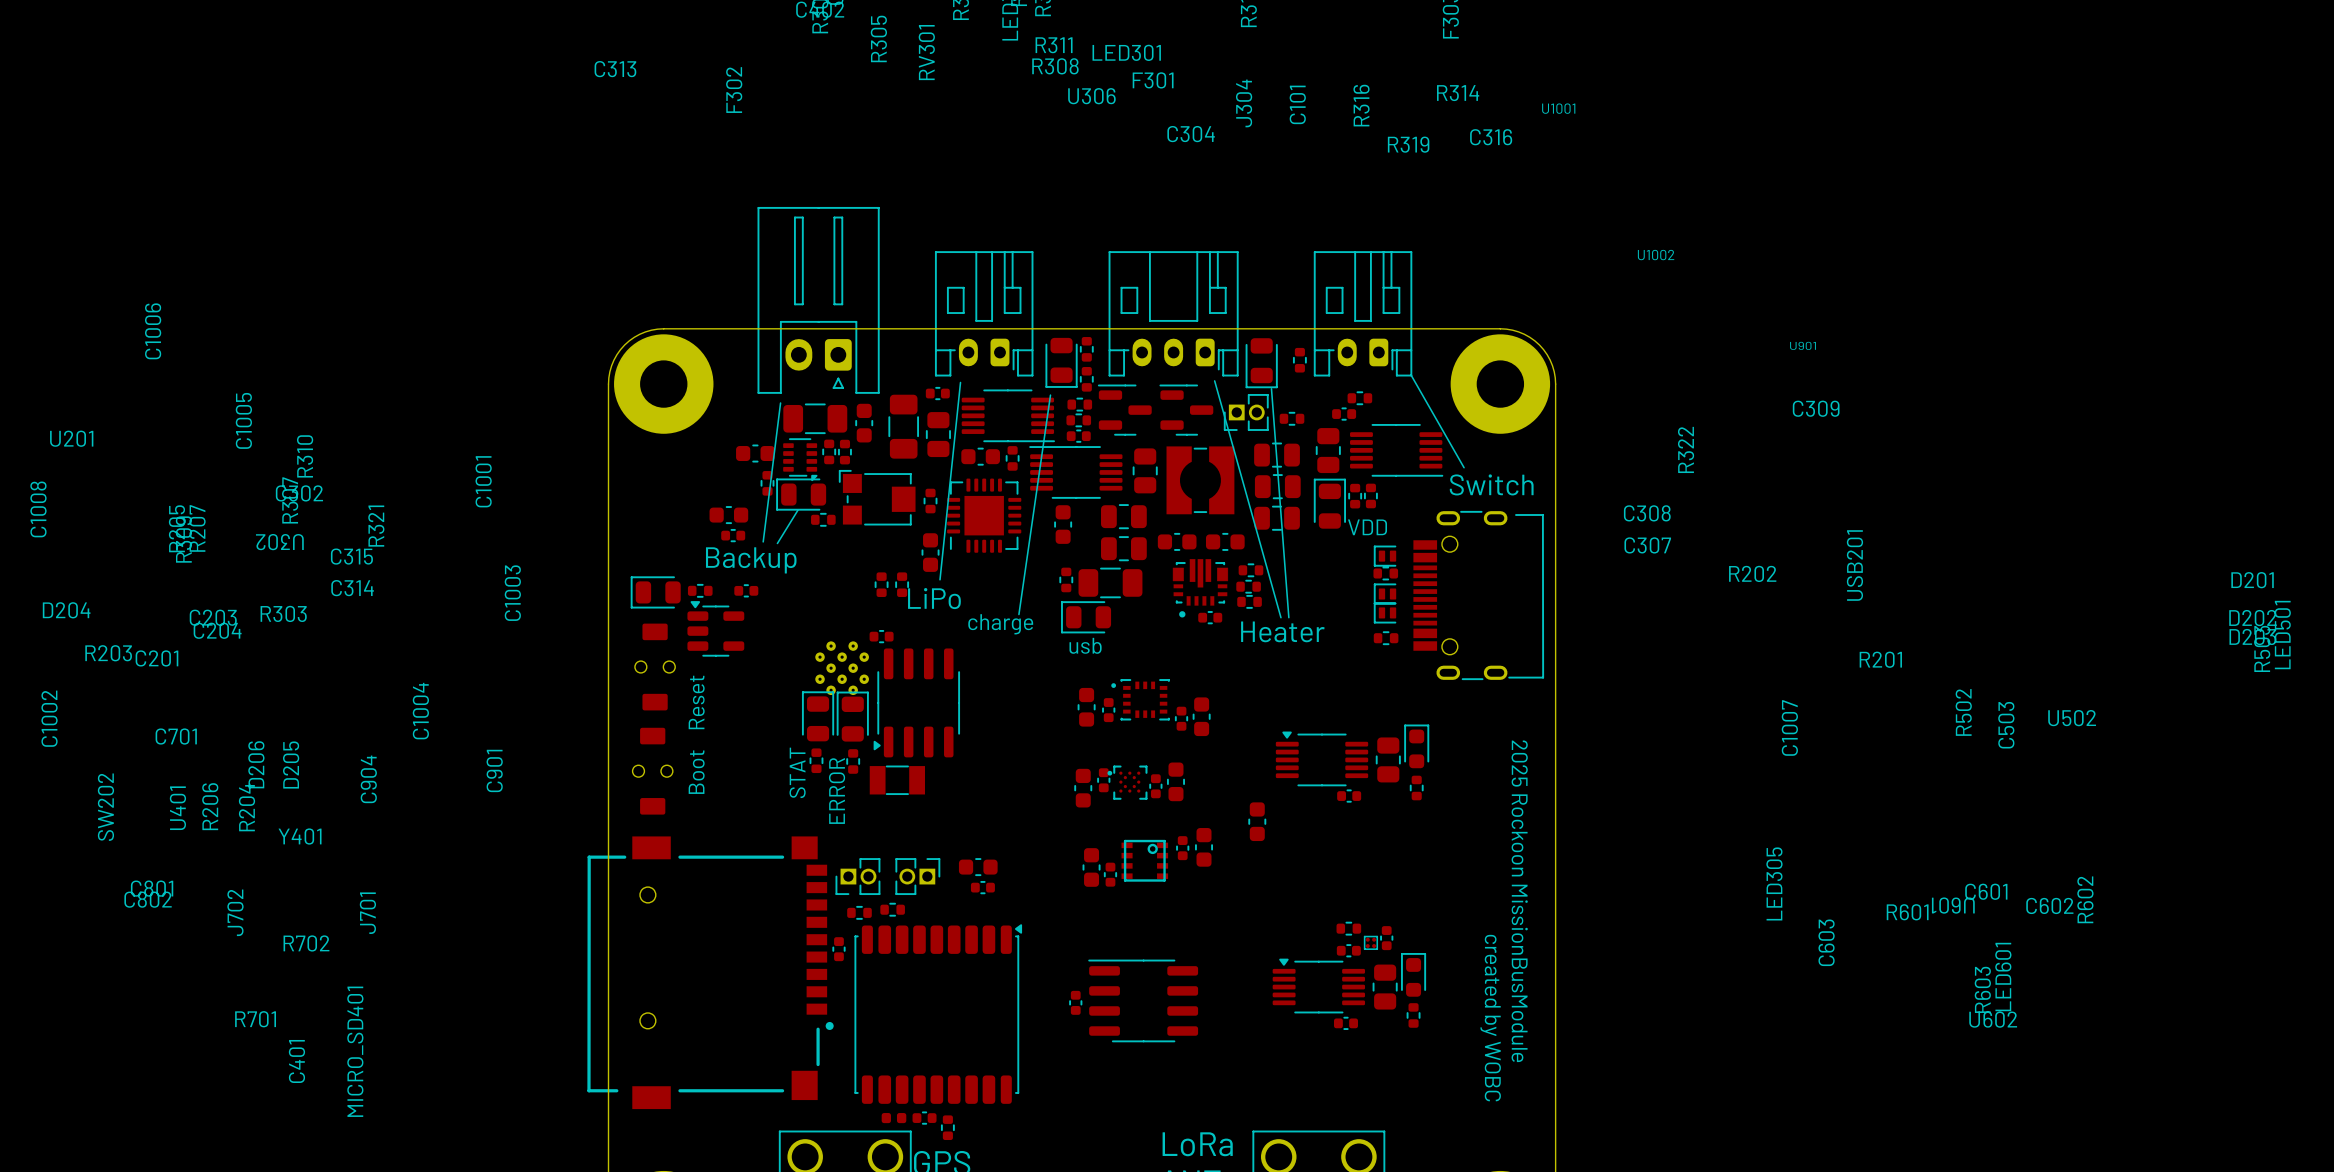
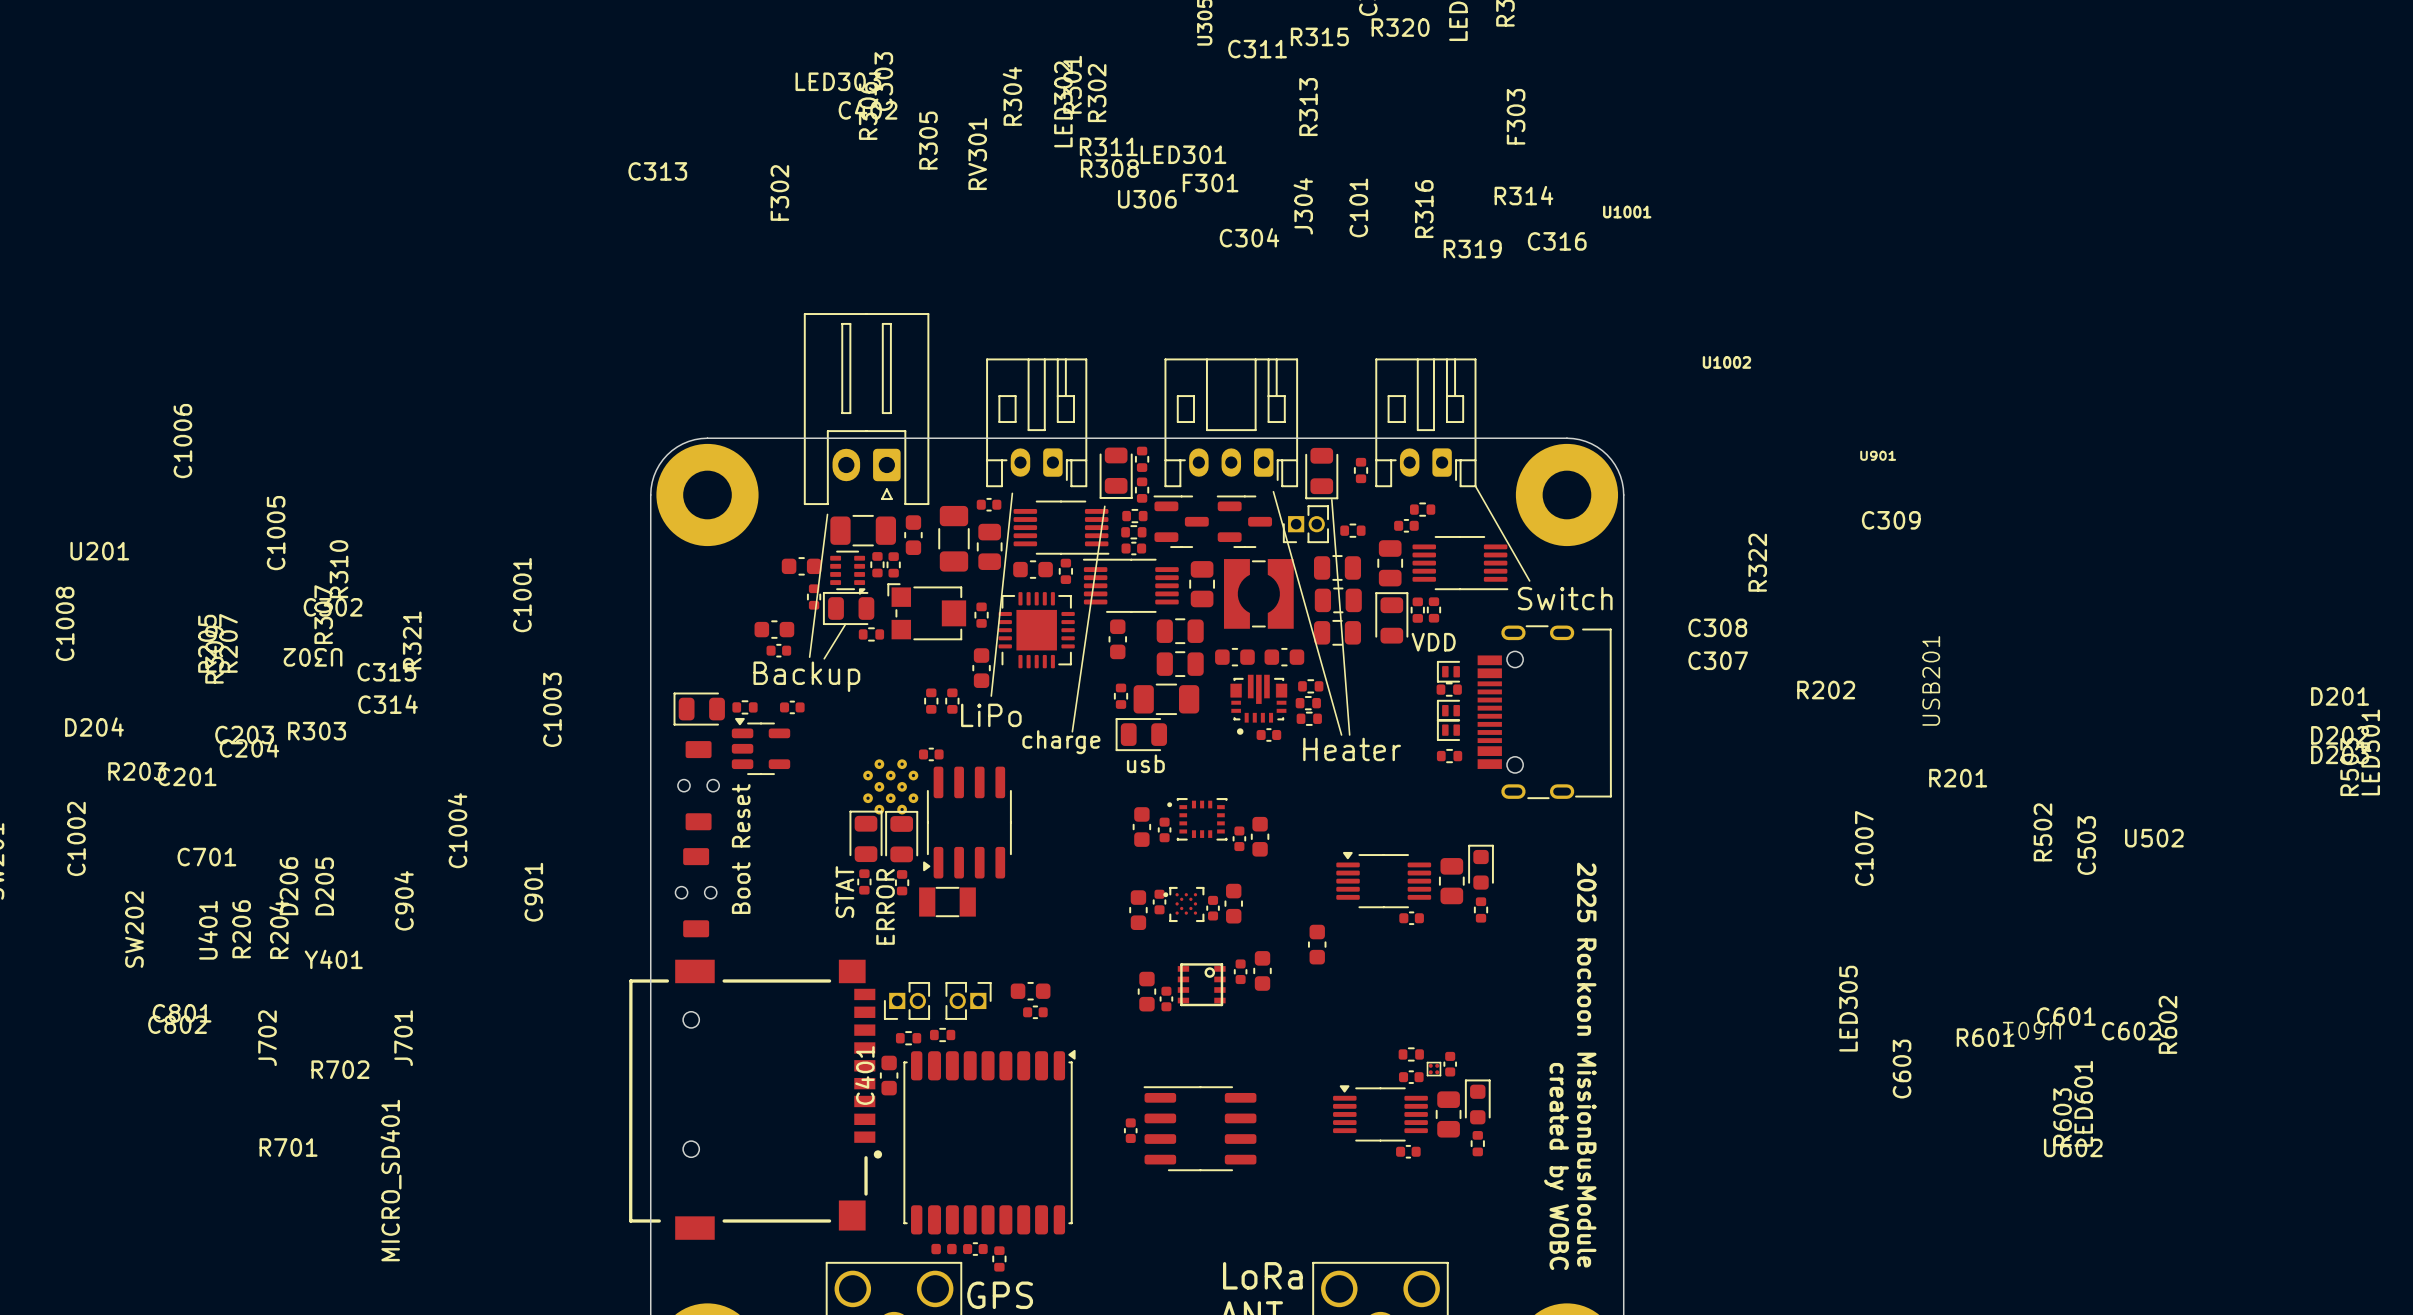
C401 footprint: [832, 937, 846, 962] -> [879, 1055, 899, 1096]
C401 name position: C401 (296, 1061) -> C401 (864, 1075)

